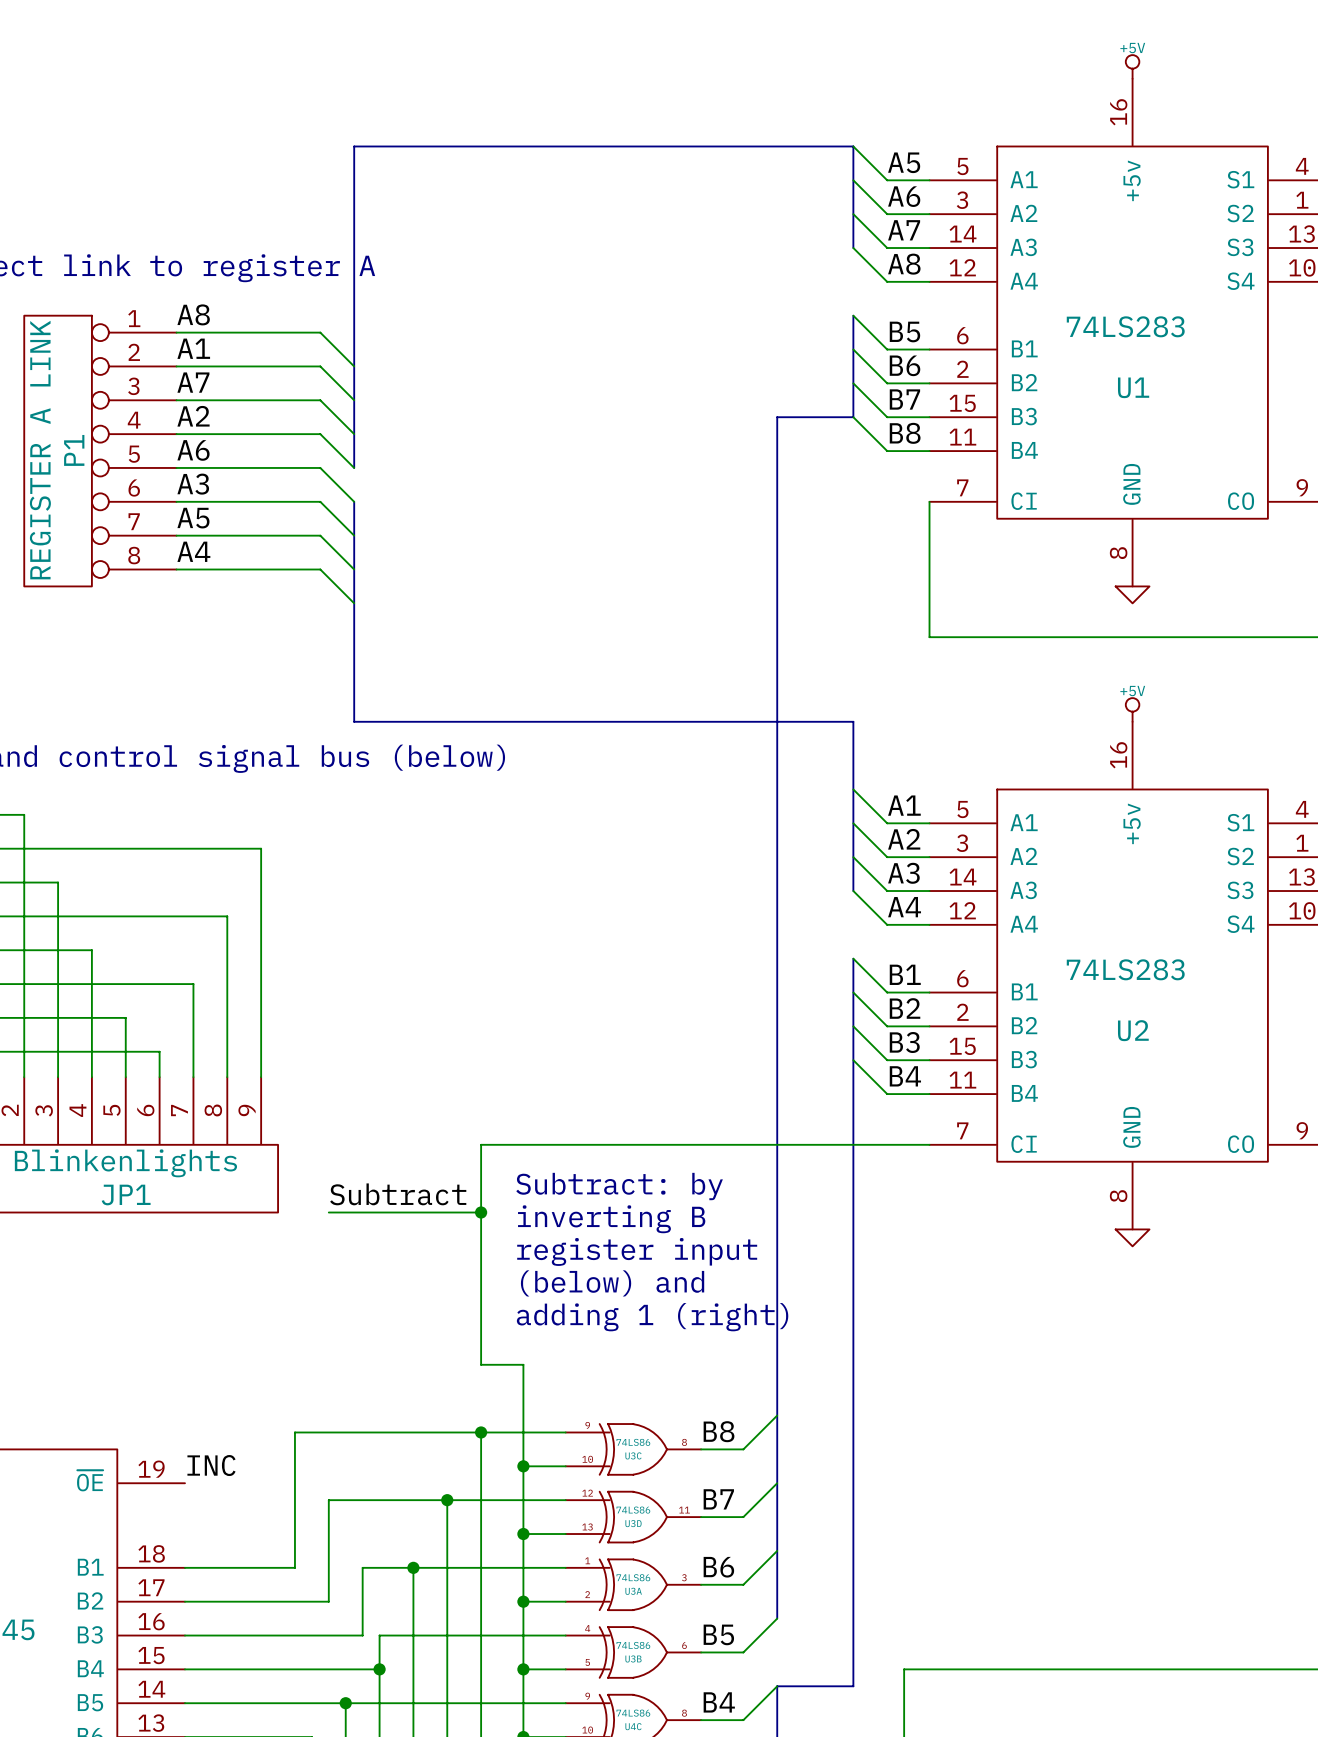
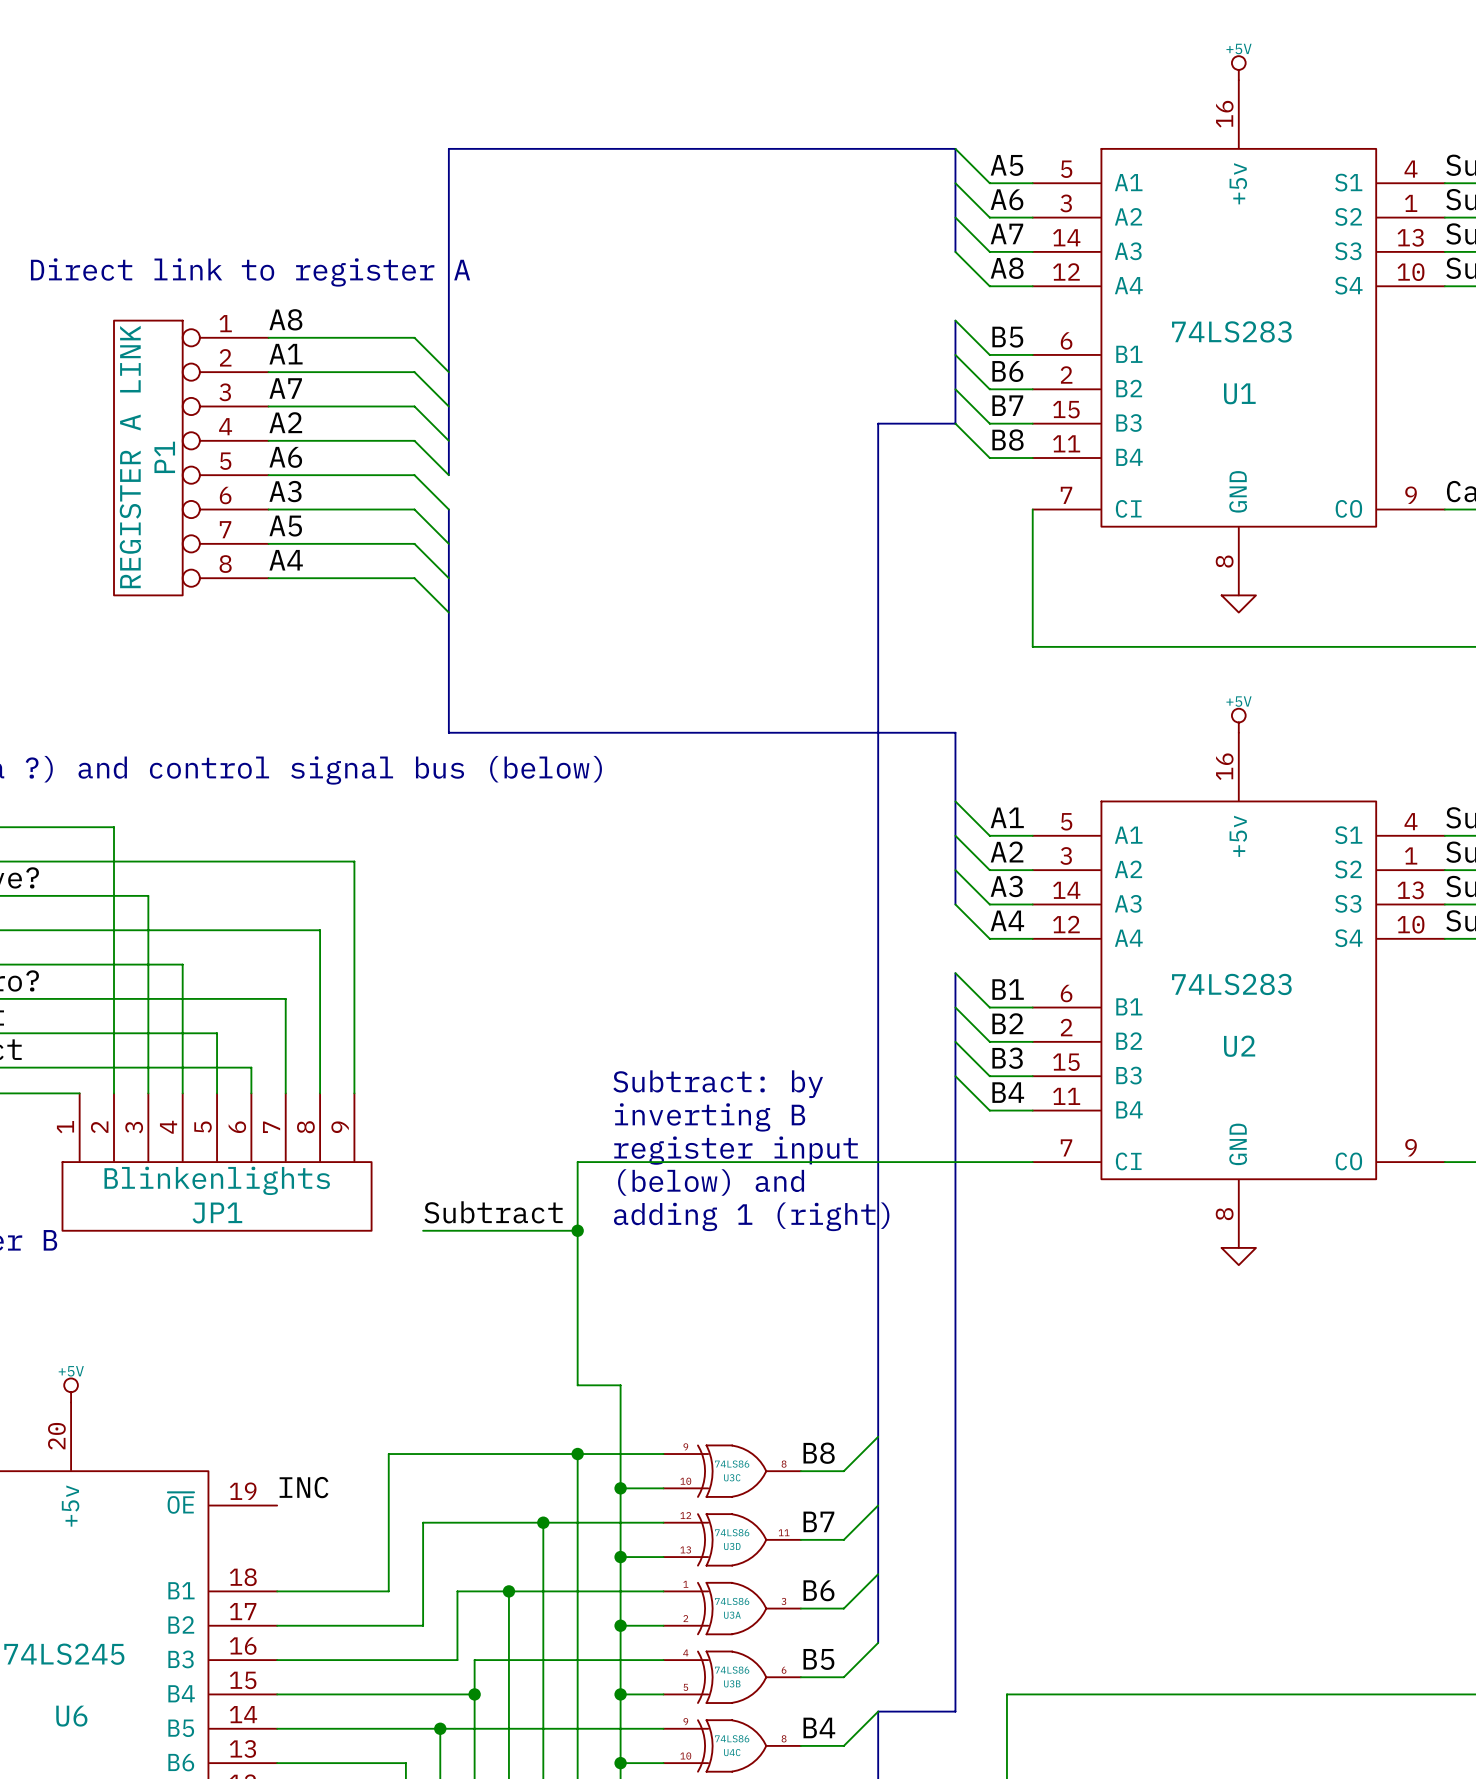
text position: Subtract: by (619, 1186) -> Subtract: by (718, 1084)
text position: inverting B (611, 1219) -> inverting B (710, 1117)
text position: register input (637, 1251) -> register input (736, 1150)
text position: (below) and (612, 1283) -> (below) and (711, 1182)
text position: adding 1 (right) (652, 1317) -> adding 1 (right) (751, 1216)

